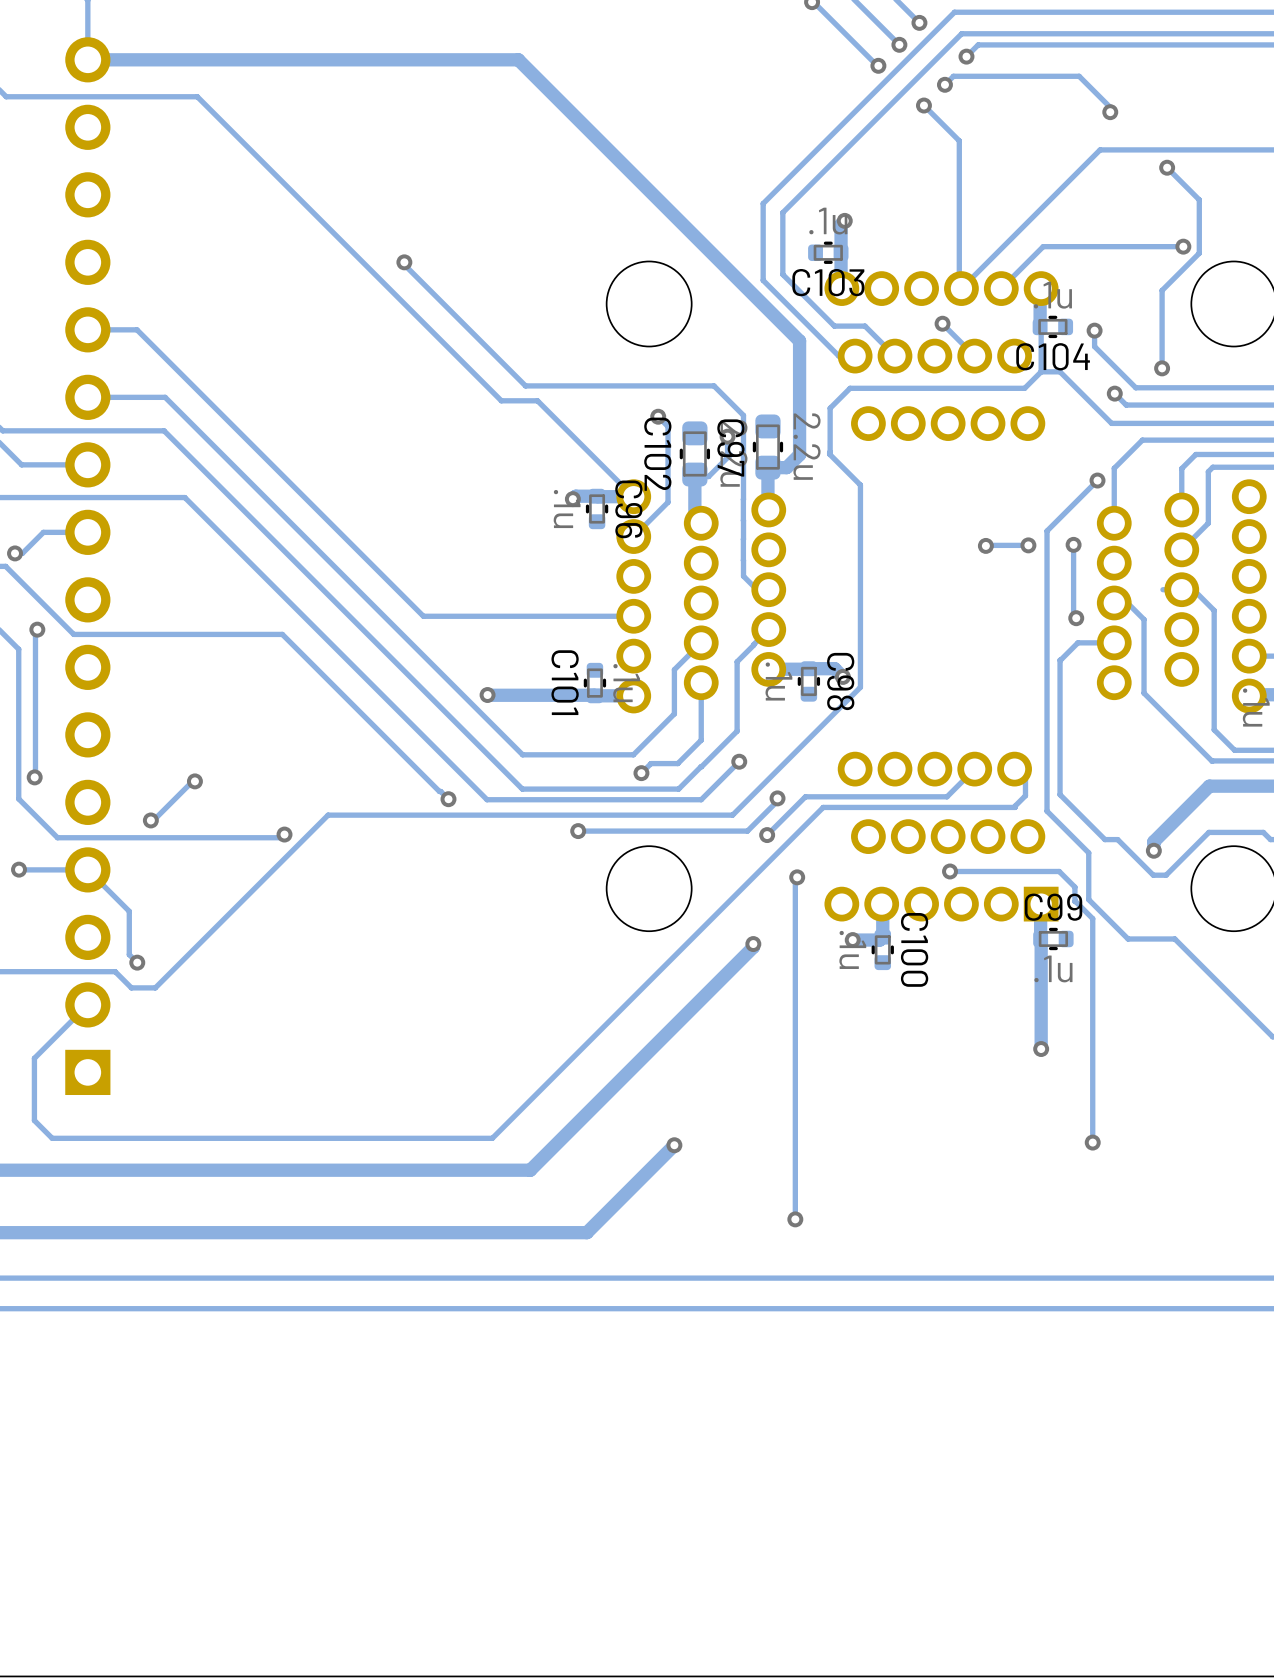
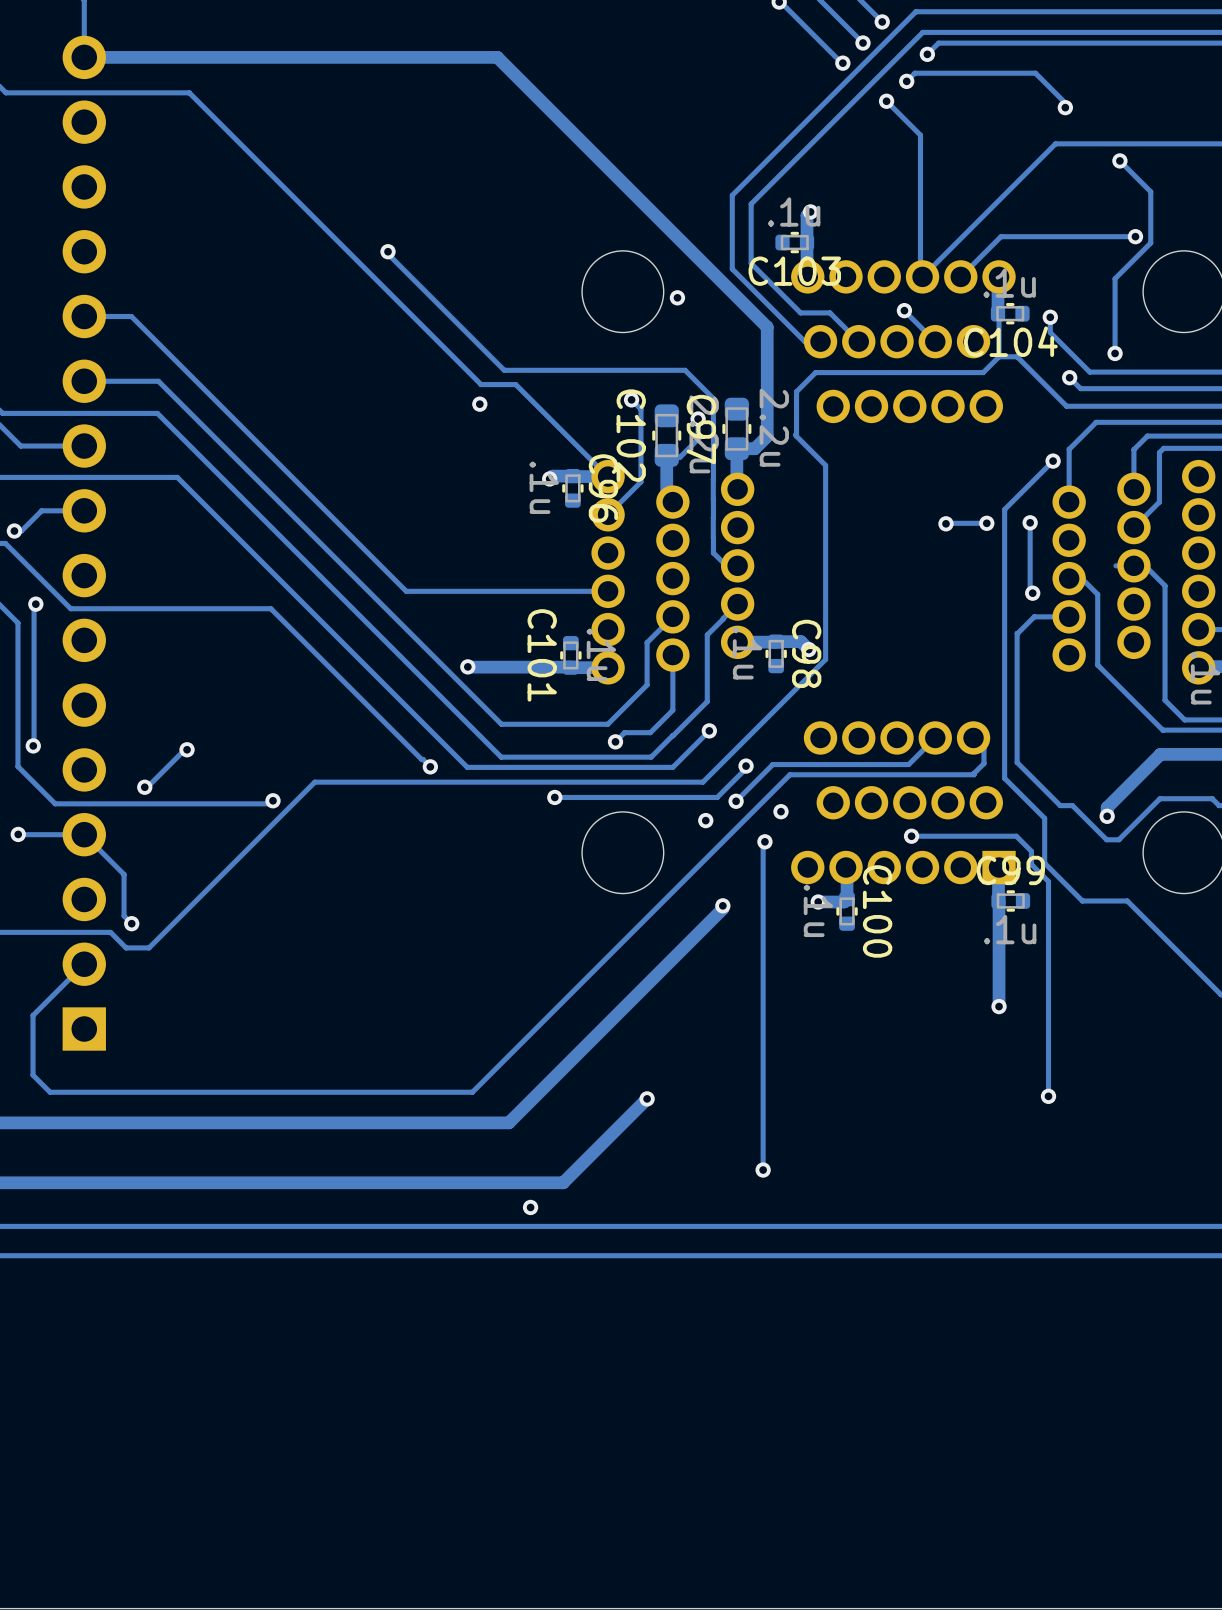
via: none -> (677, 297)
via: none -> (479, 404)
via: none -> (780, 811)
via: none -> (705, 820)
via: none -> (530, 1207)

